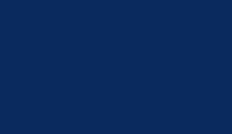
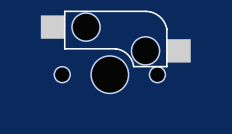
part: none -> (115, 52)

